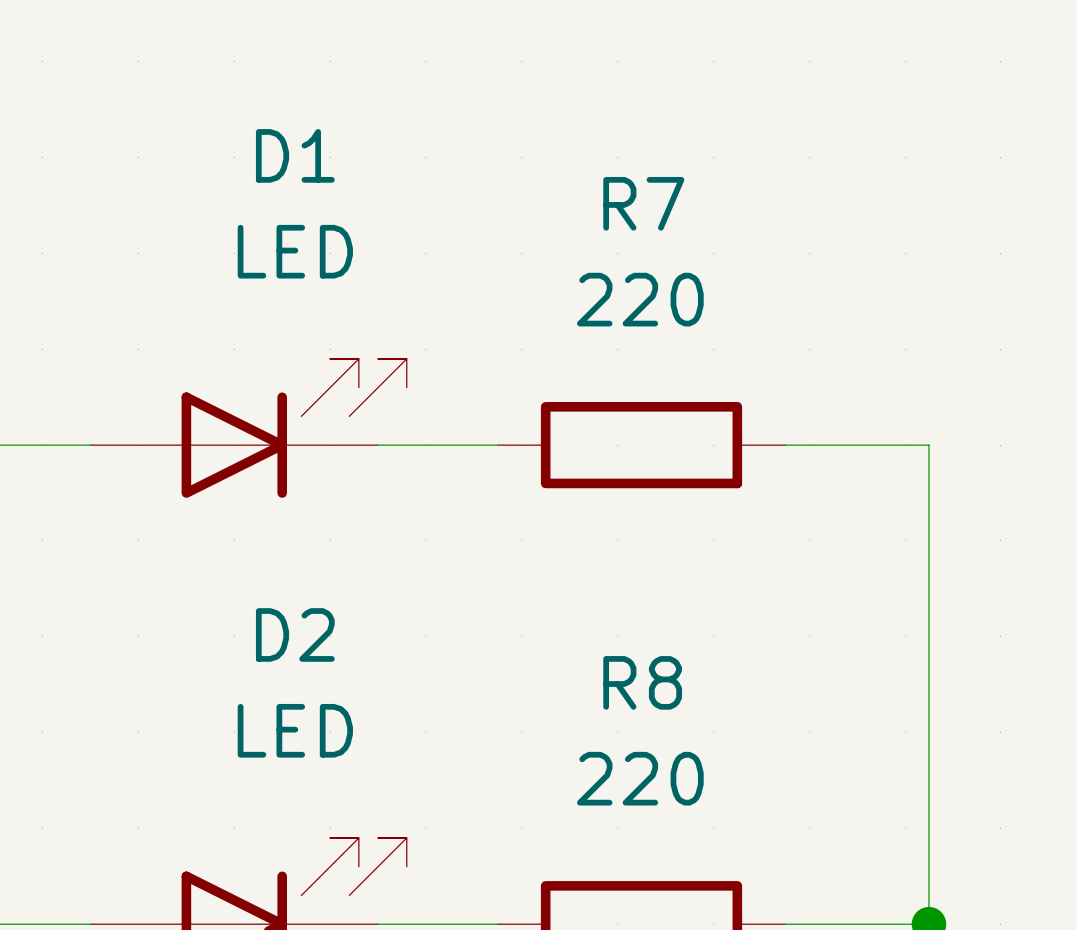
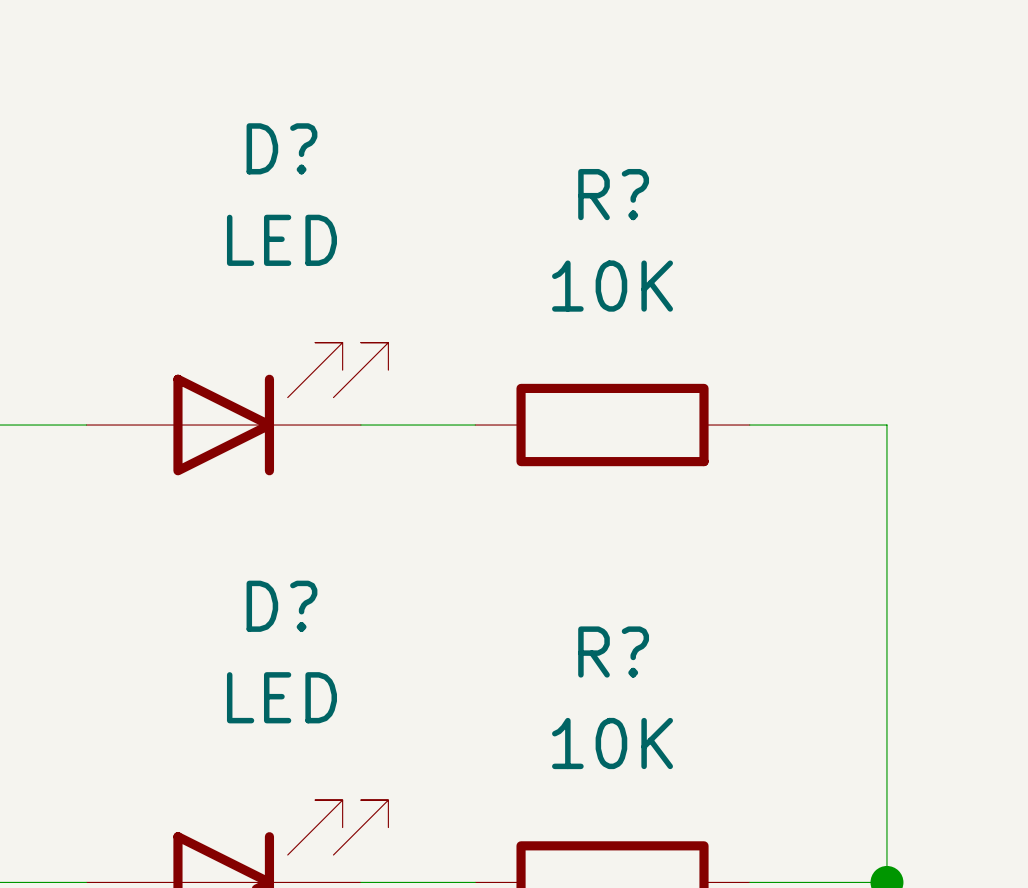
D1 name: D1 (295, 155) -> D? (281, 148)
R7 name: R7 (643, 203) -> R? (613, 194)
R7 value: 220 (640, 299) -> 10K (612, 286)
D2 name: D2 (295, 634) -> D? (281, 606)
R8 name: R8 (642, 682) -> R? (613, 652)
R8 value: 220 (640, 778) -> 10K (612, 743)

